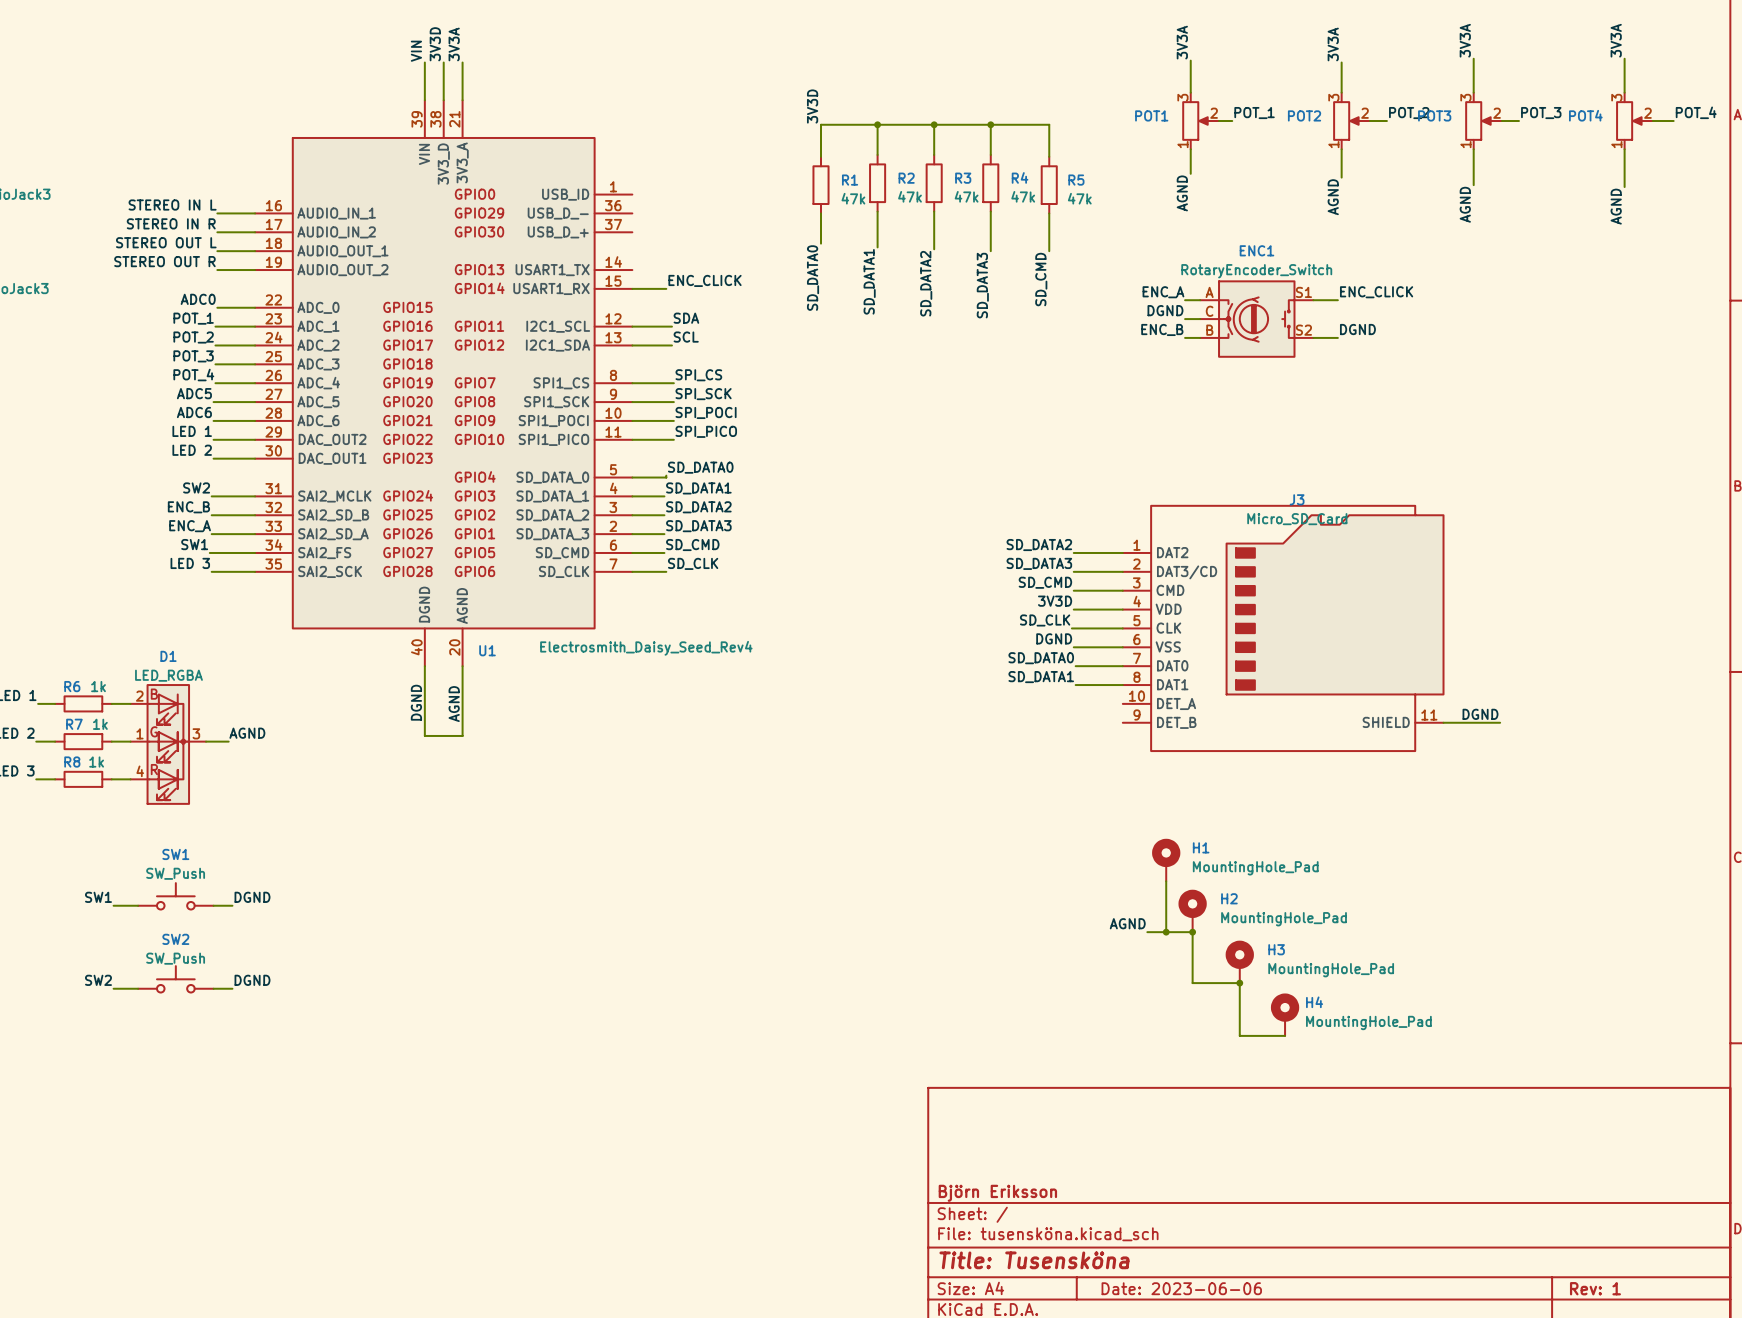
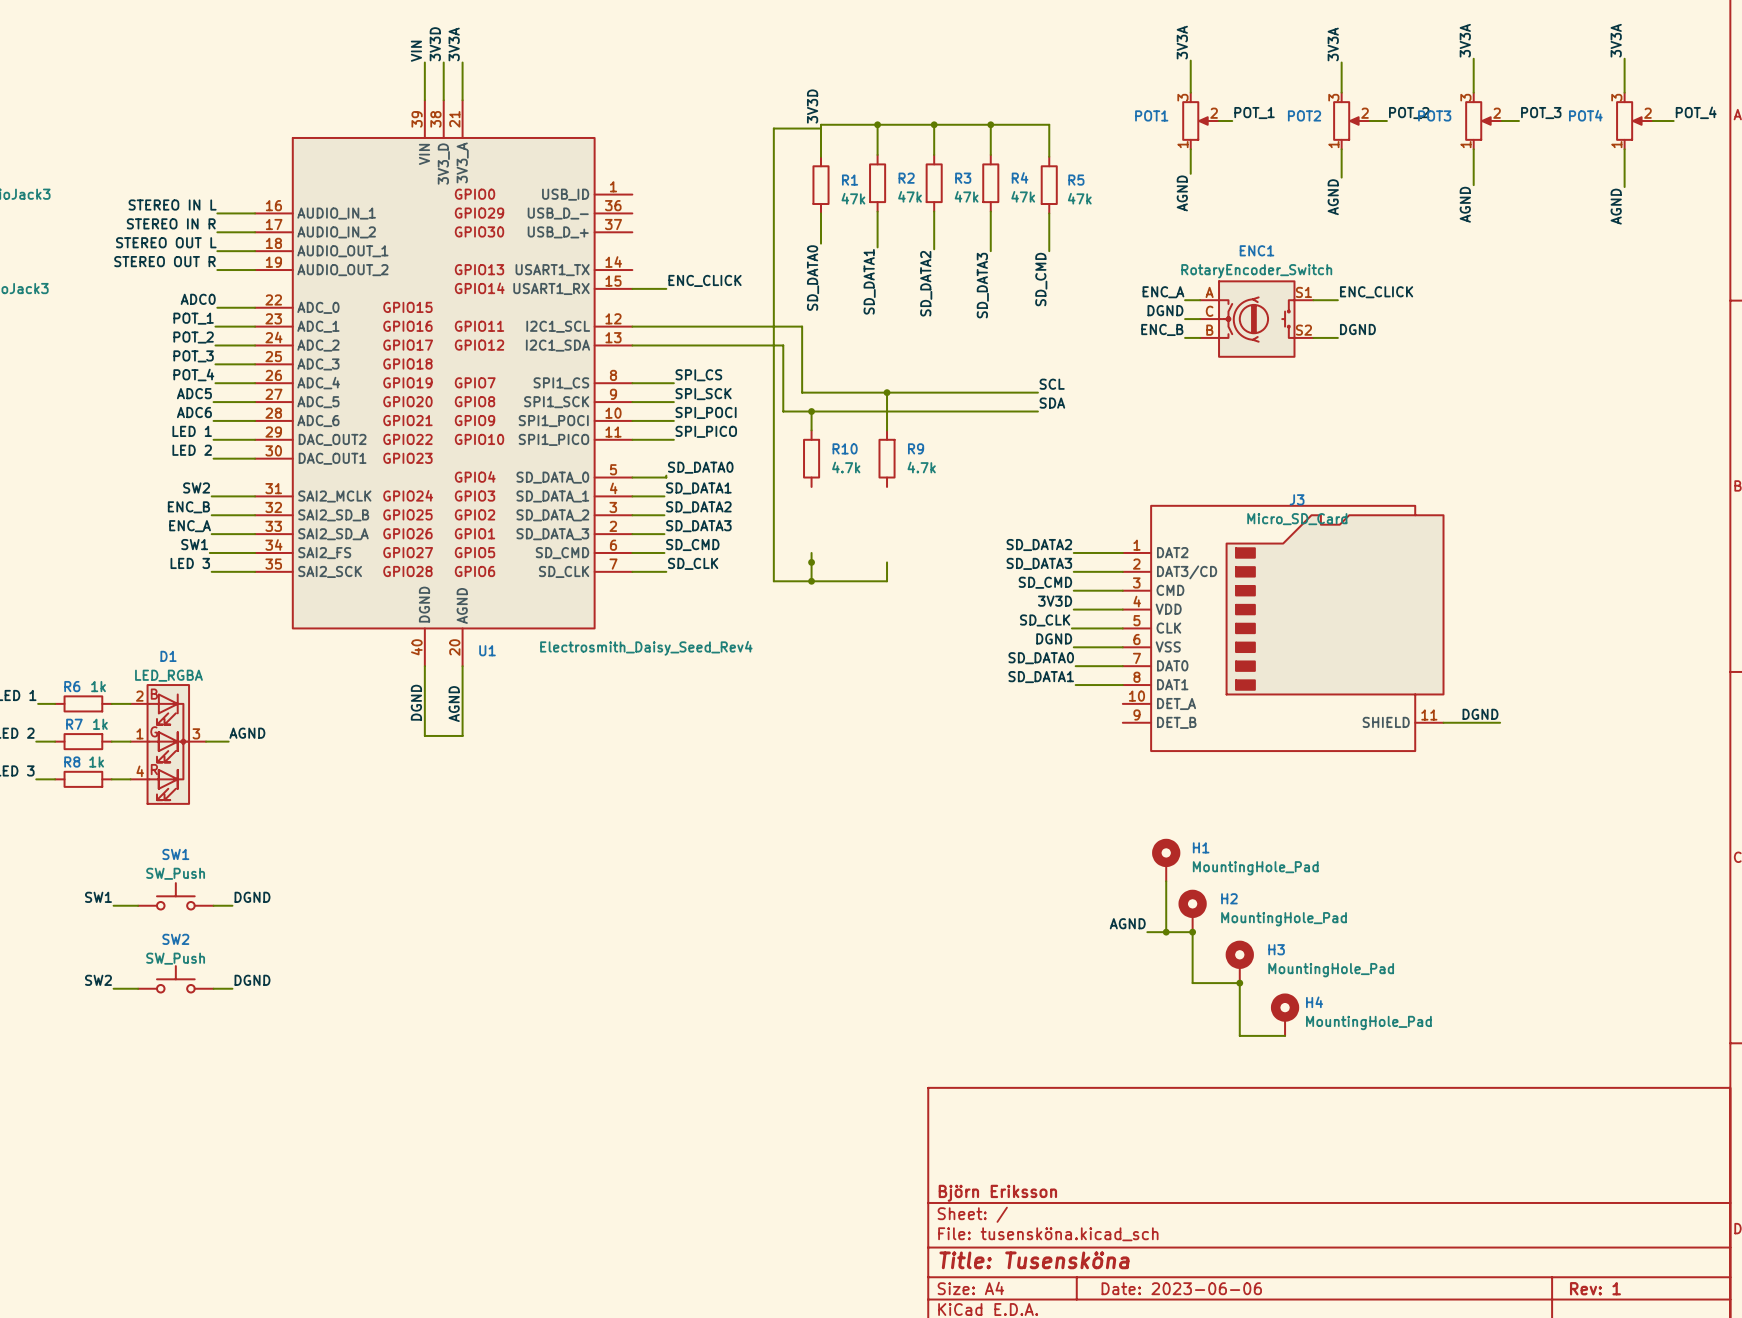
wire: none -> (821, 128) (773, 128) (773, 581) (887, 581) (887, 562)
label: SDA (686, 318) -> none
wire: none -> (671, 326) (802, 326) (802, 392) (1037, 392)
label: SCL (686, 337) -> none
wire: none -> (671, 345) (783, 345) (783, 411) (1037, 411)
label: none -> SCL (1052, 384)
wire: none -> (887, 392) (887, 430)
junction: none -> (887, 392)
label: none -> SDA (1052, 403)
wire: none -> (811, 411) (811, 430)
junction: none -> (811, 411)
R10: none -> 4.7k (811, 458)
R9: none -> 4.7k (887, 458)
wire: none -> (811, 552) (811, 581)
junction: none -> (811, 562)
junction: none -> (811, 581)

